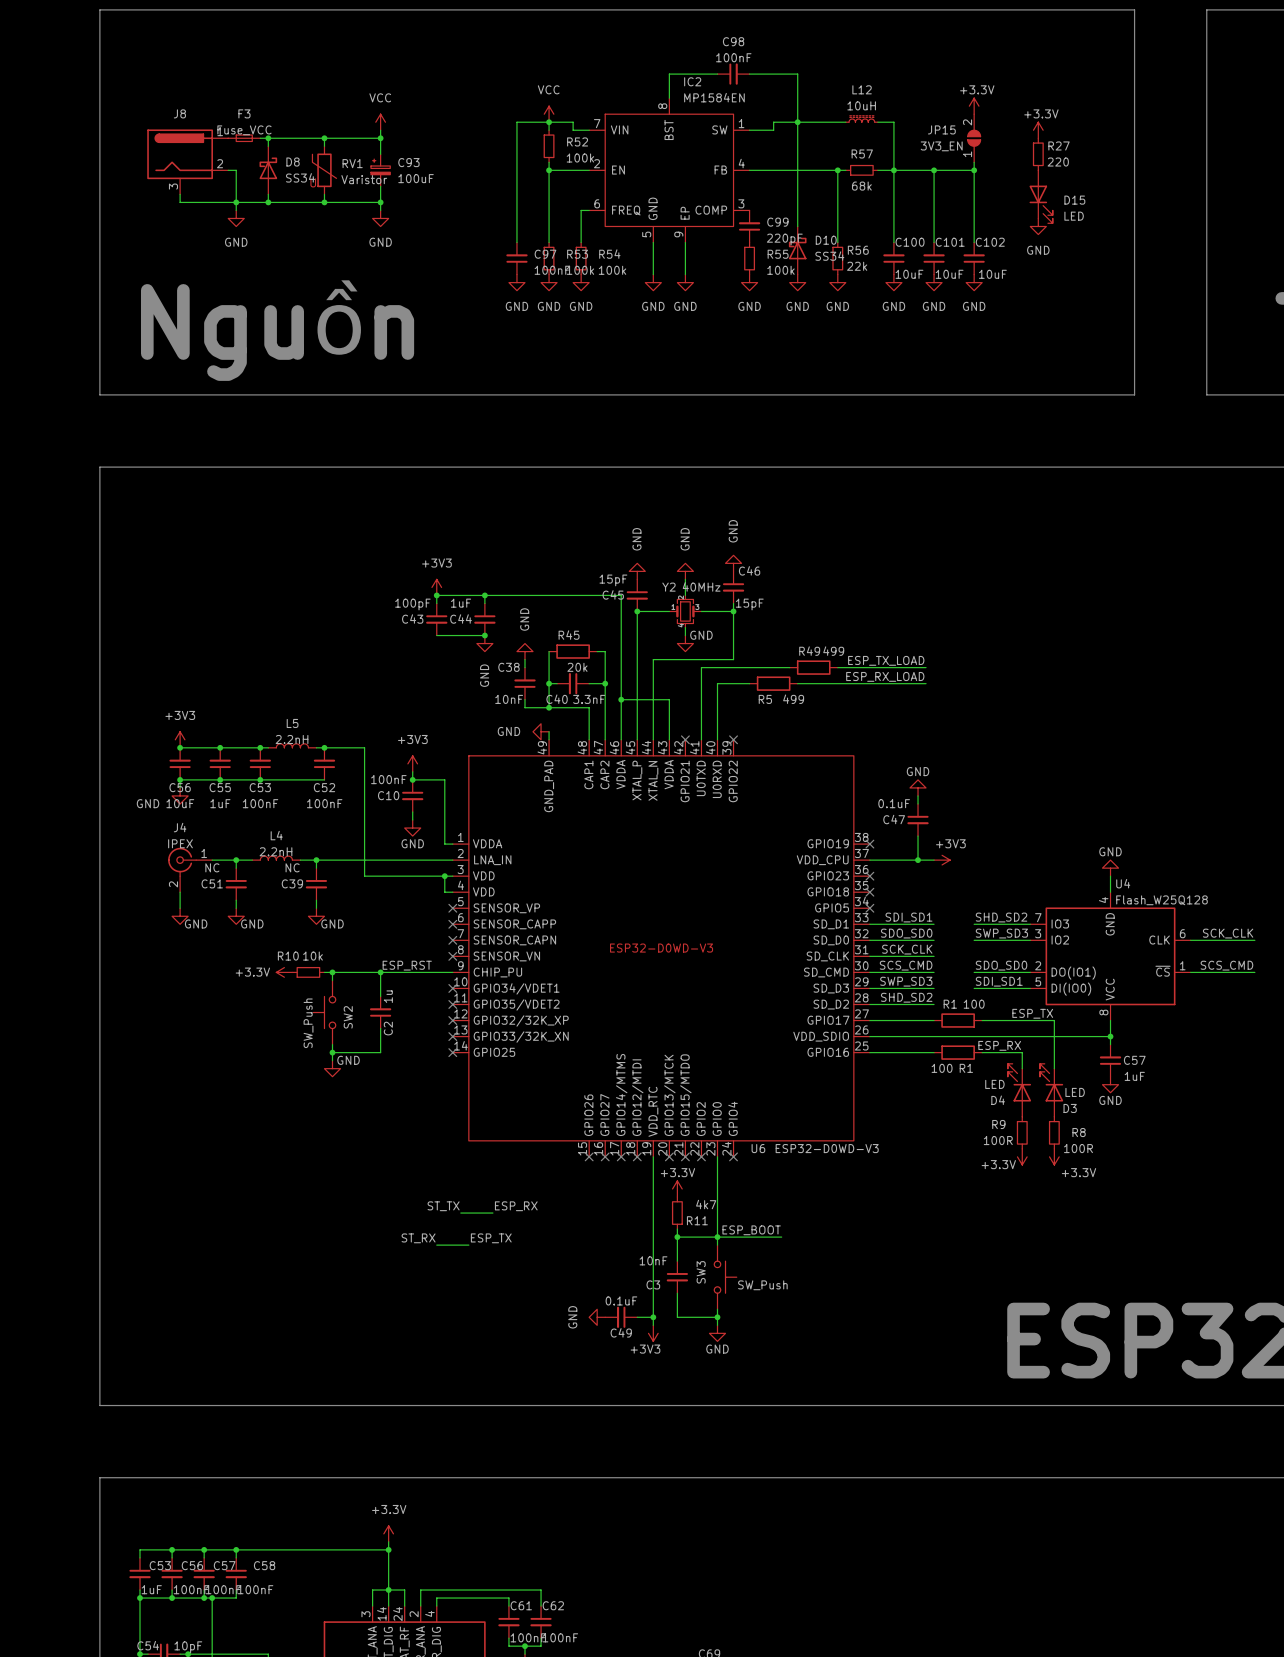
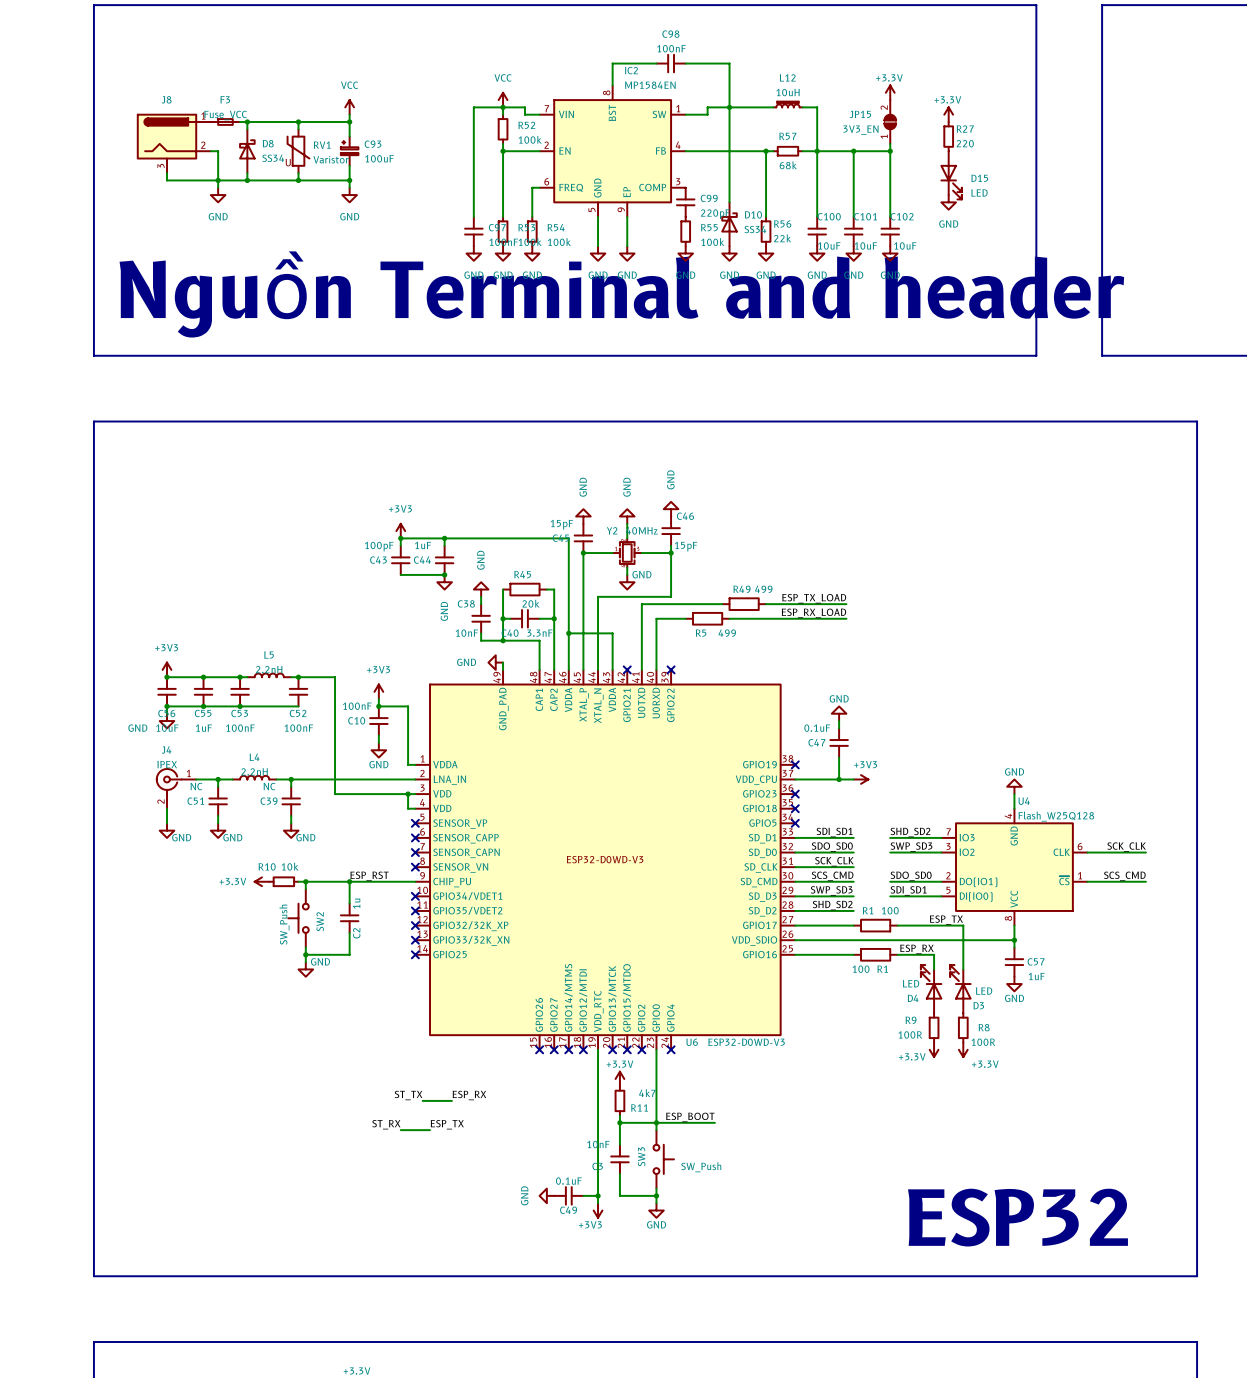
text: none -> Terminal and header (752, 287)

